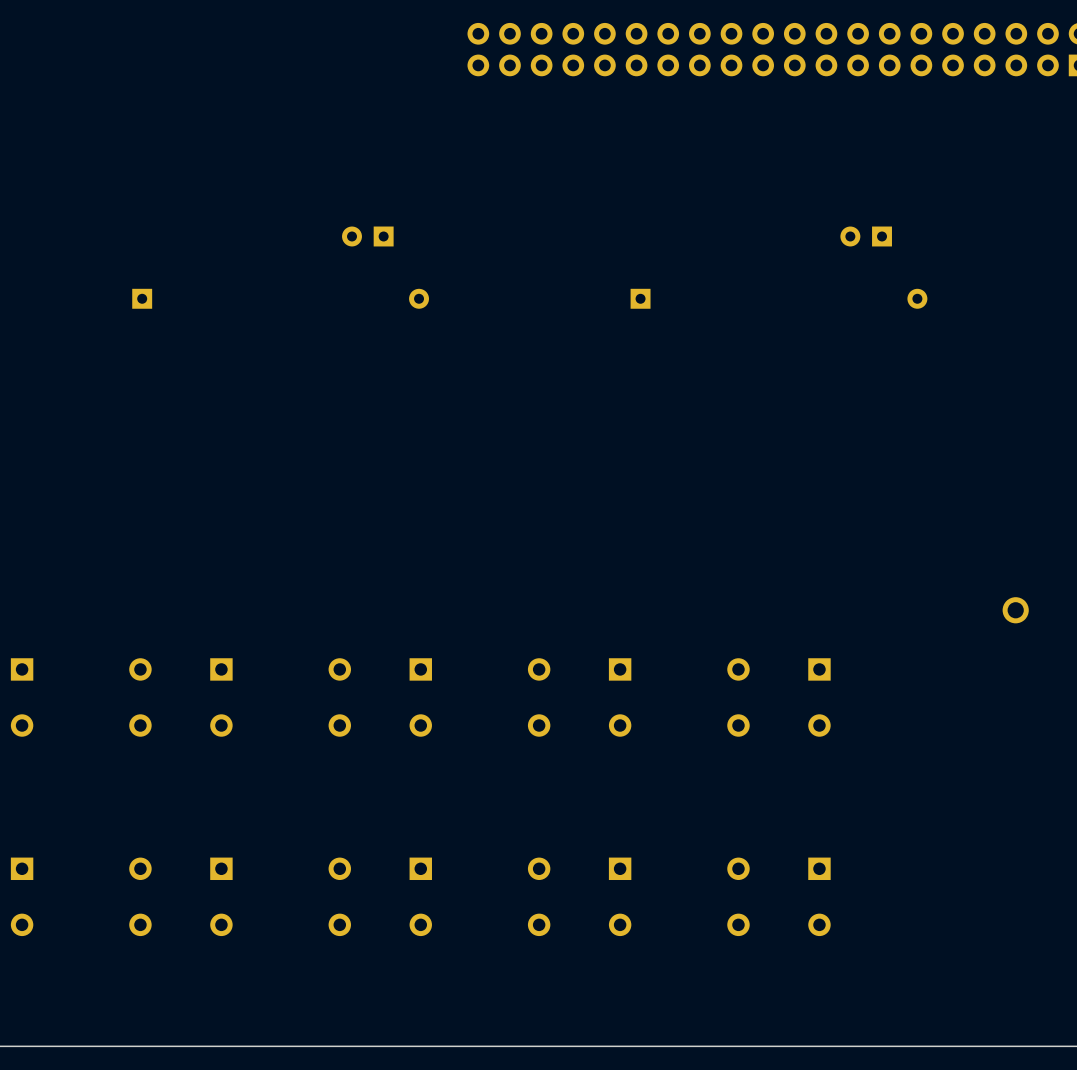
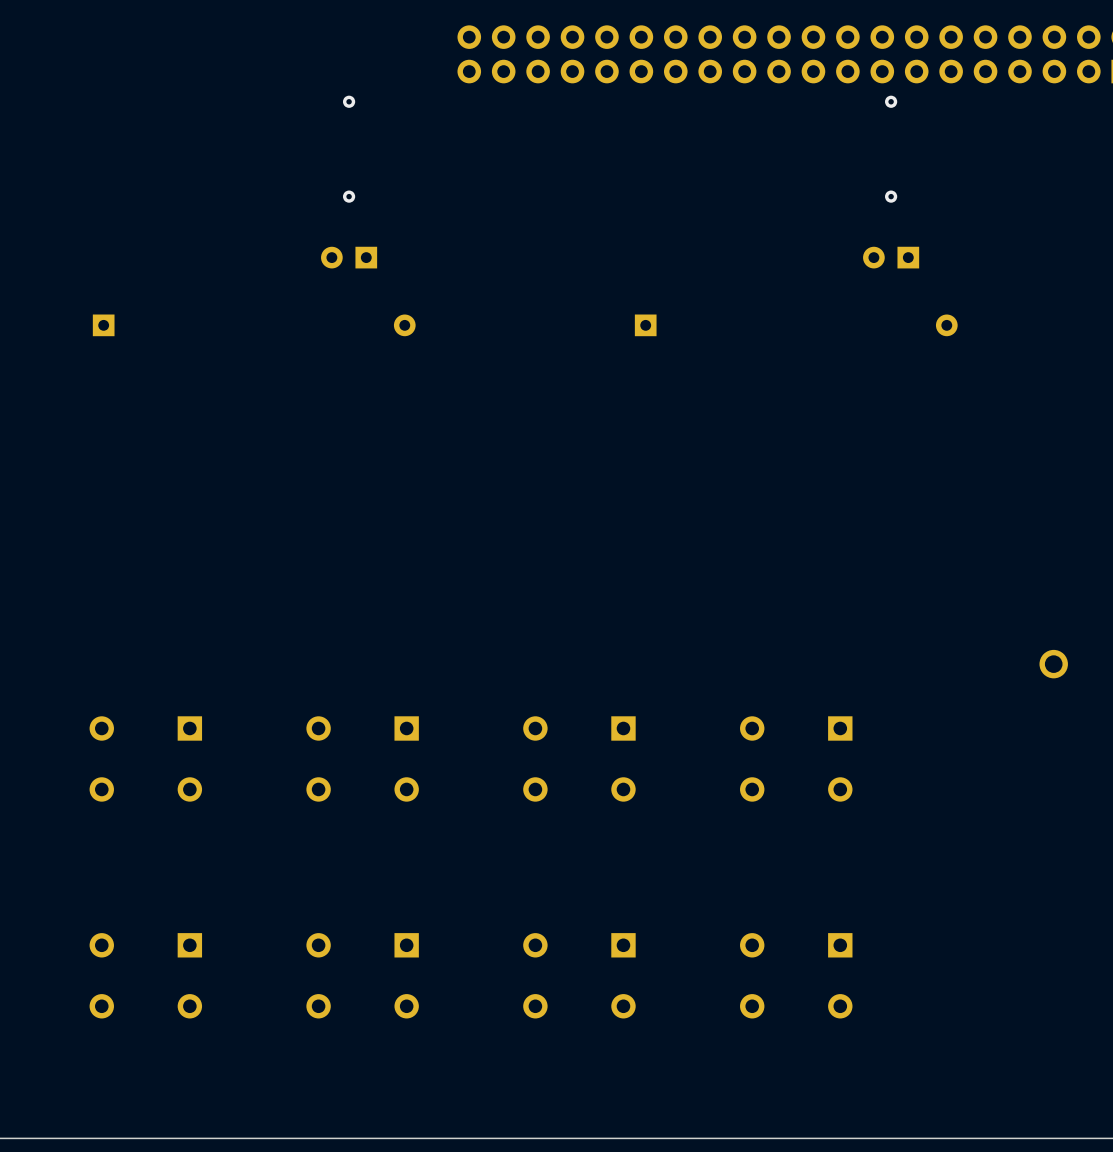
via: none -> (349, 101)
via: none -> (891, 101)
via: none -> (349, 196)
via: none -> (891, 196)

